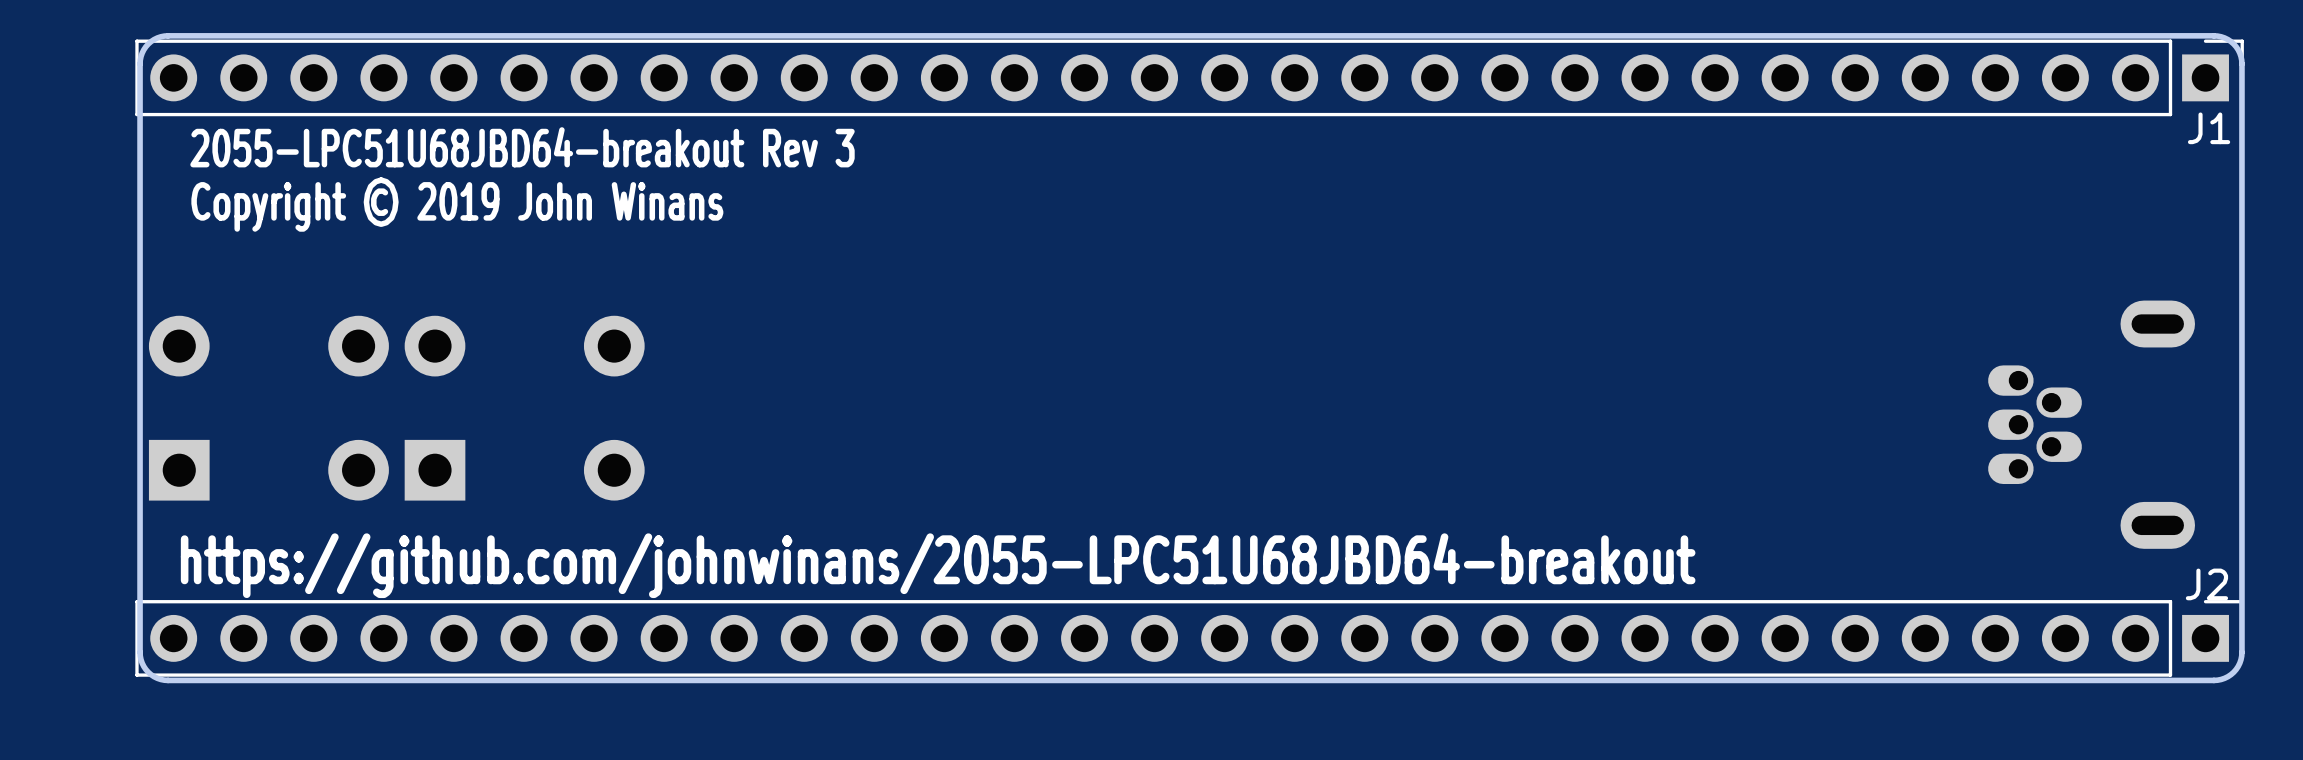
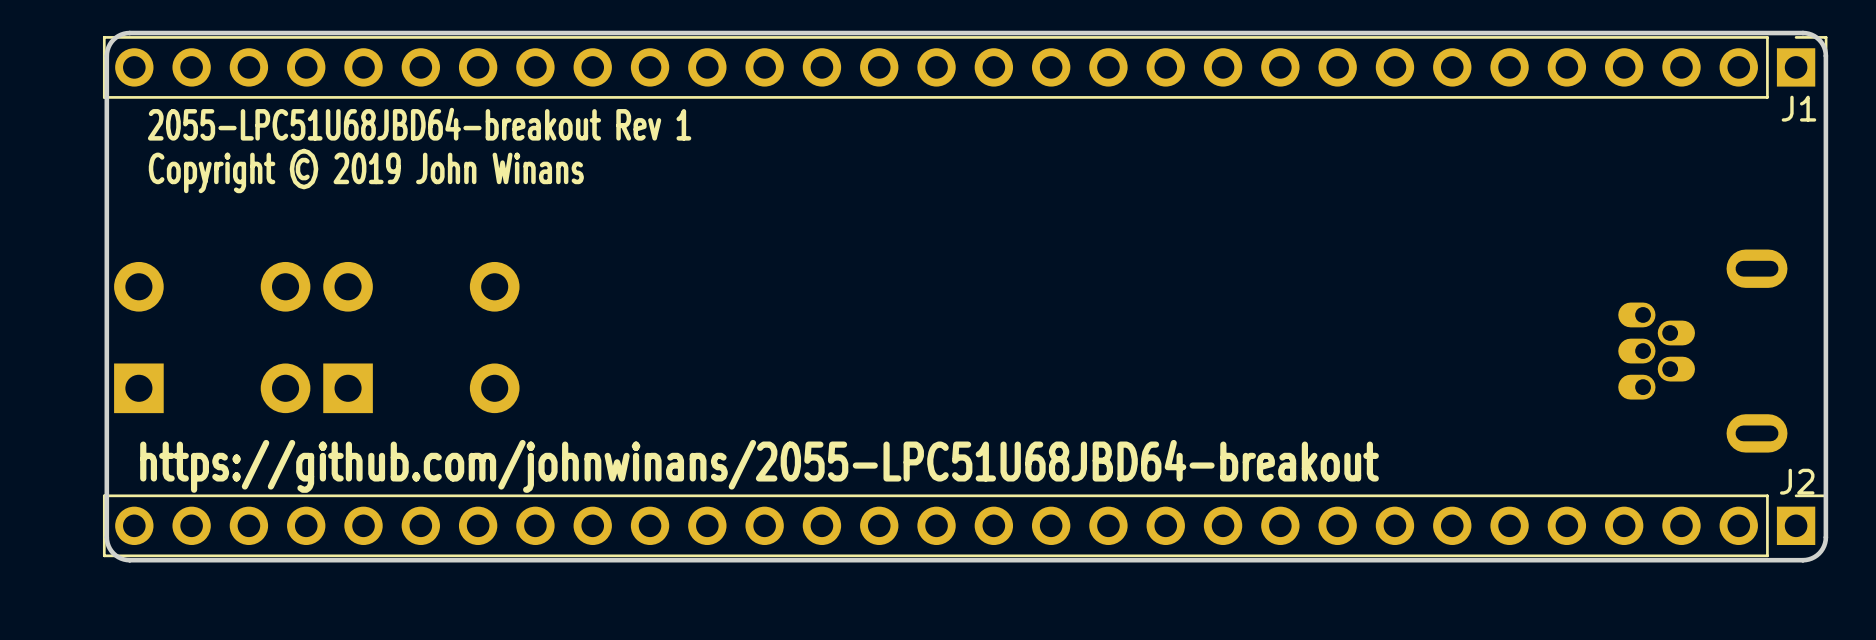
text: 2055-LPC51U68JBD64-breakout Rev 3 (522, 147) -> 2055-LPC51U68JBD64-breakout Rev 1 (419, 124)

